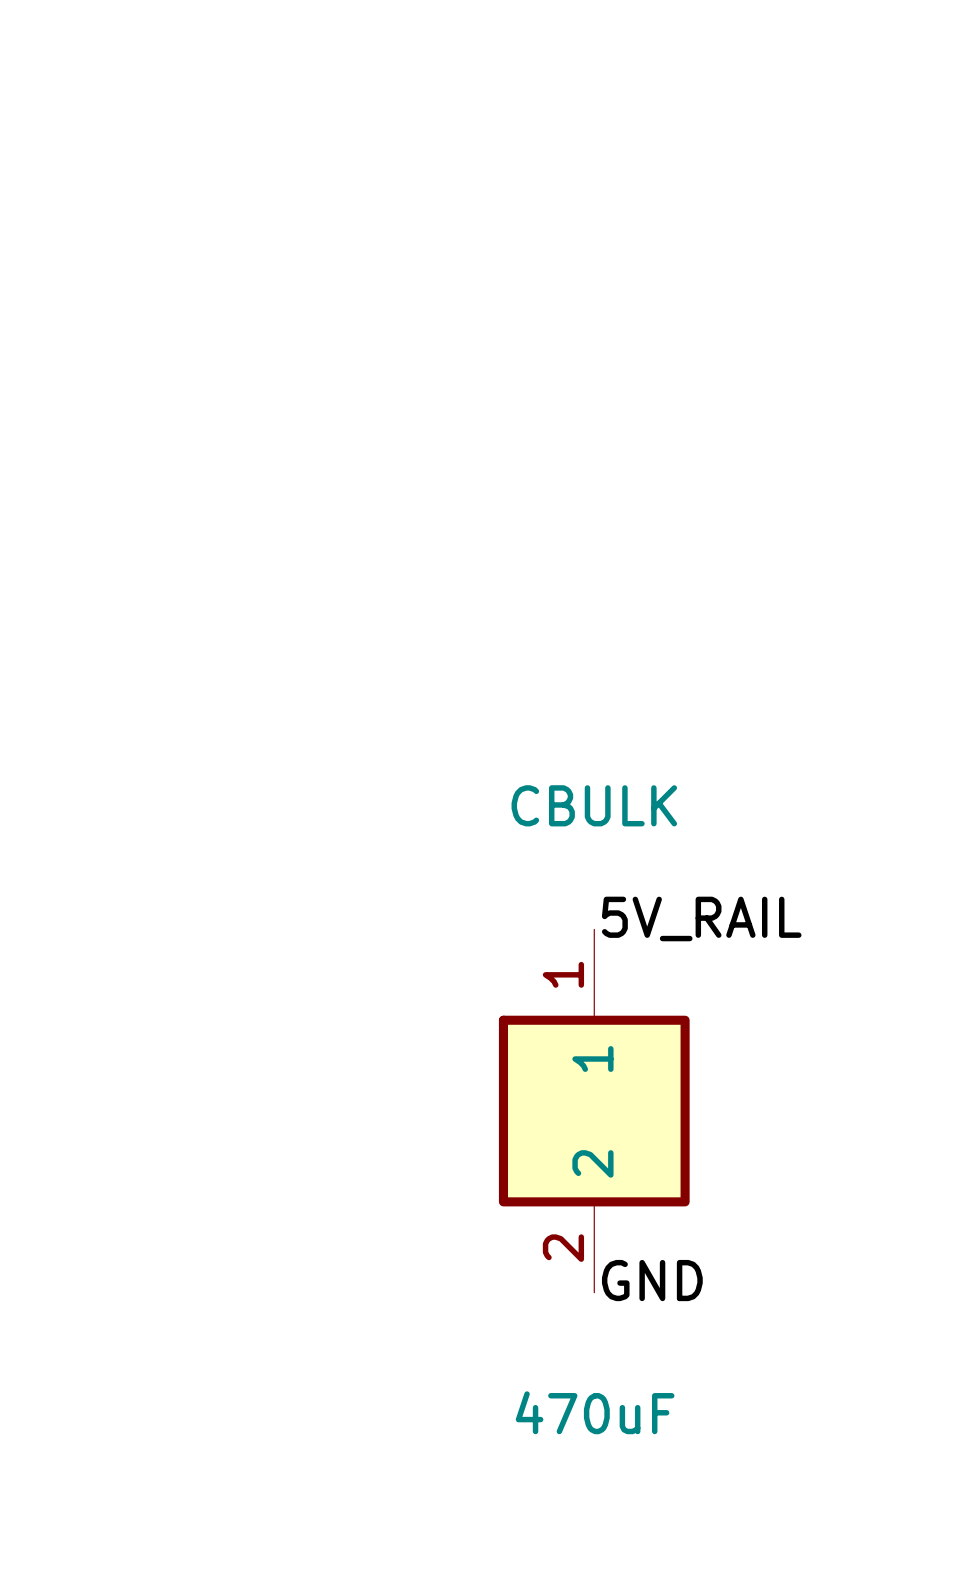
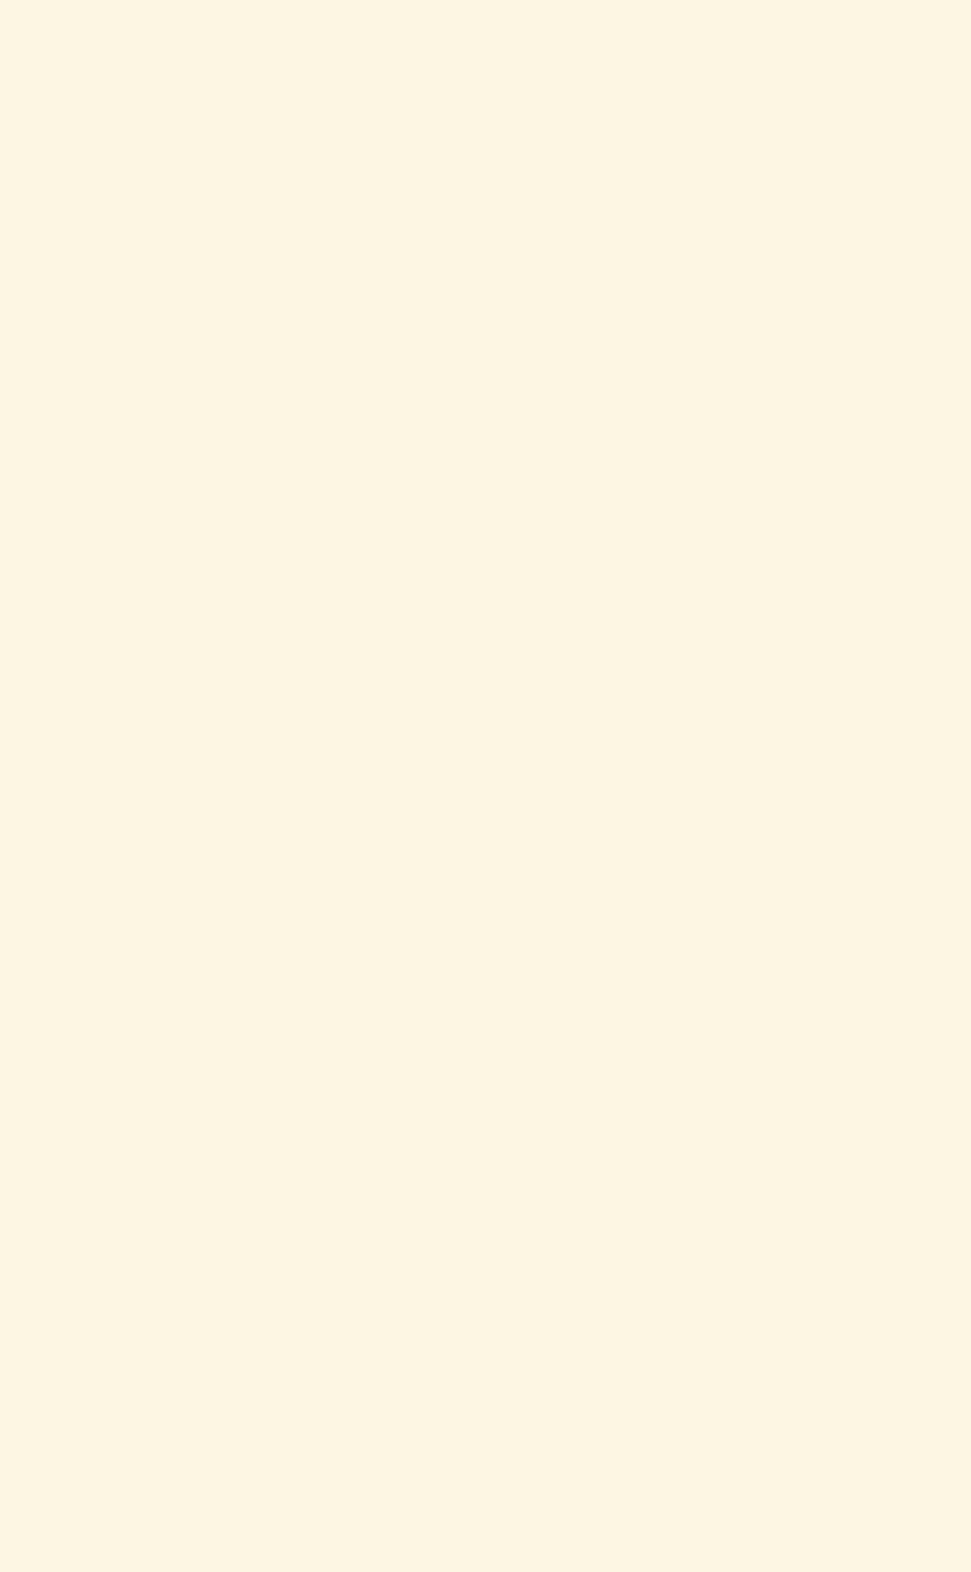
label: 5V_RAIL (701, 918) -> none
CBULK: 470uF (594, 1111) -> none
label: GND (652, 1280) -> none

